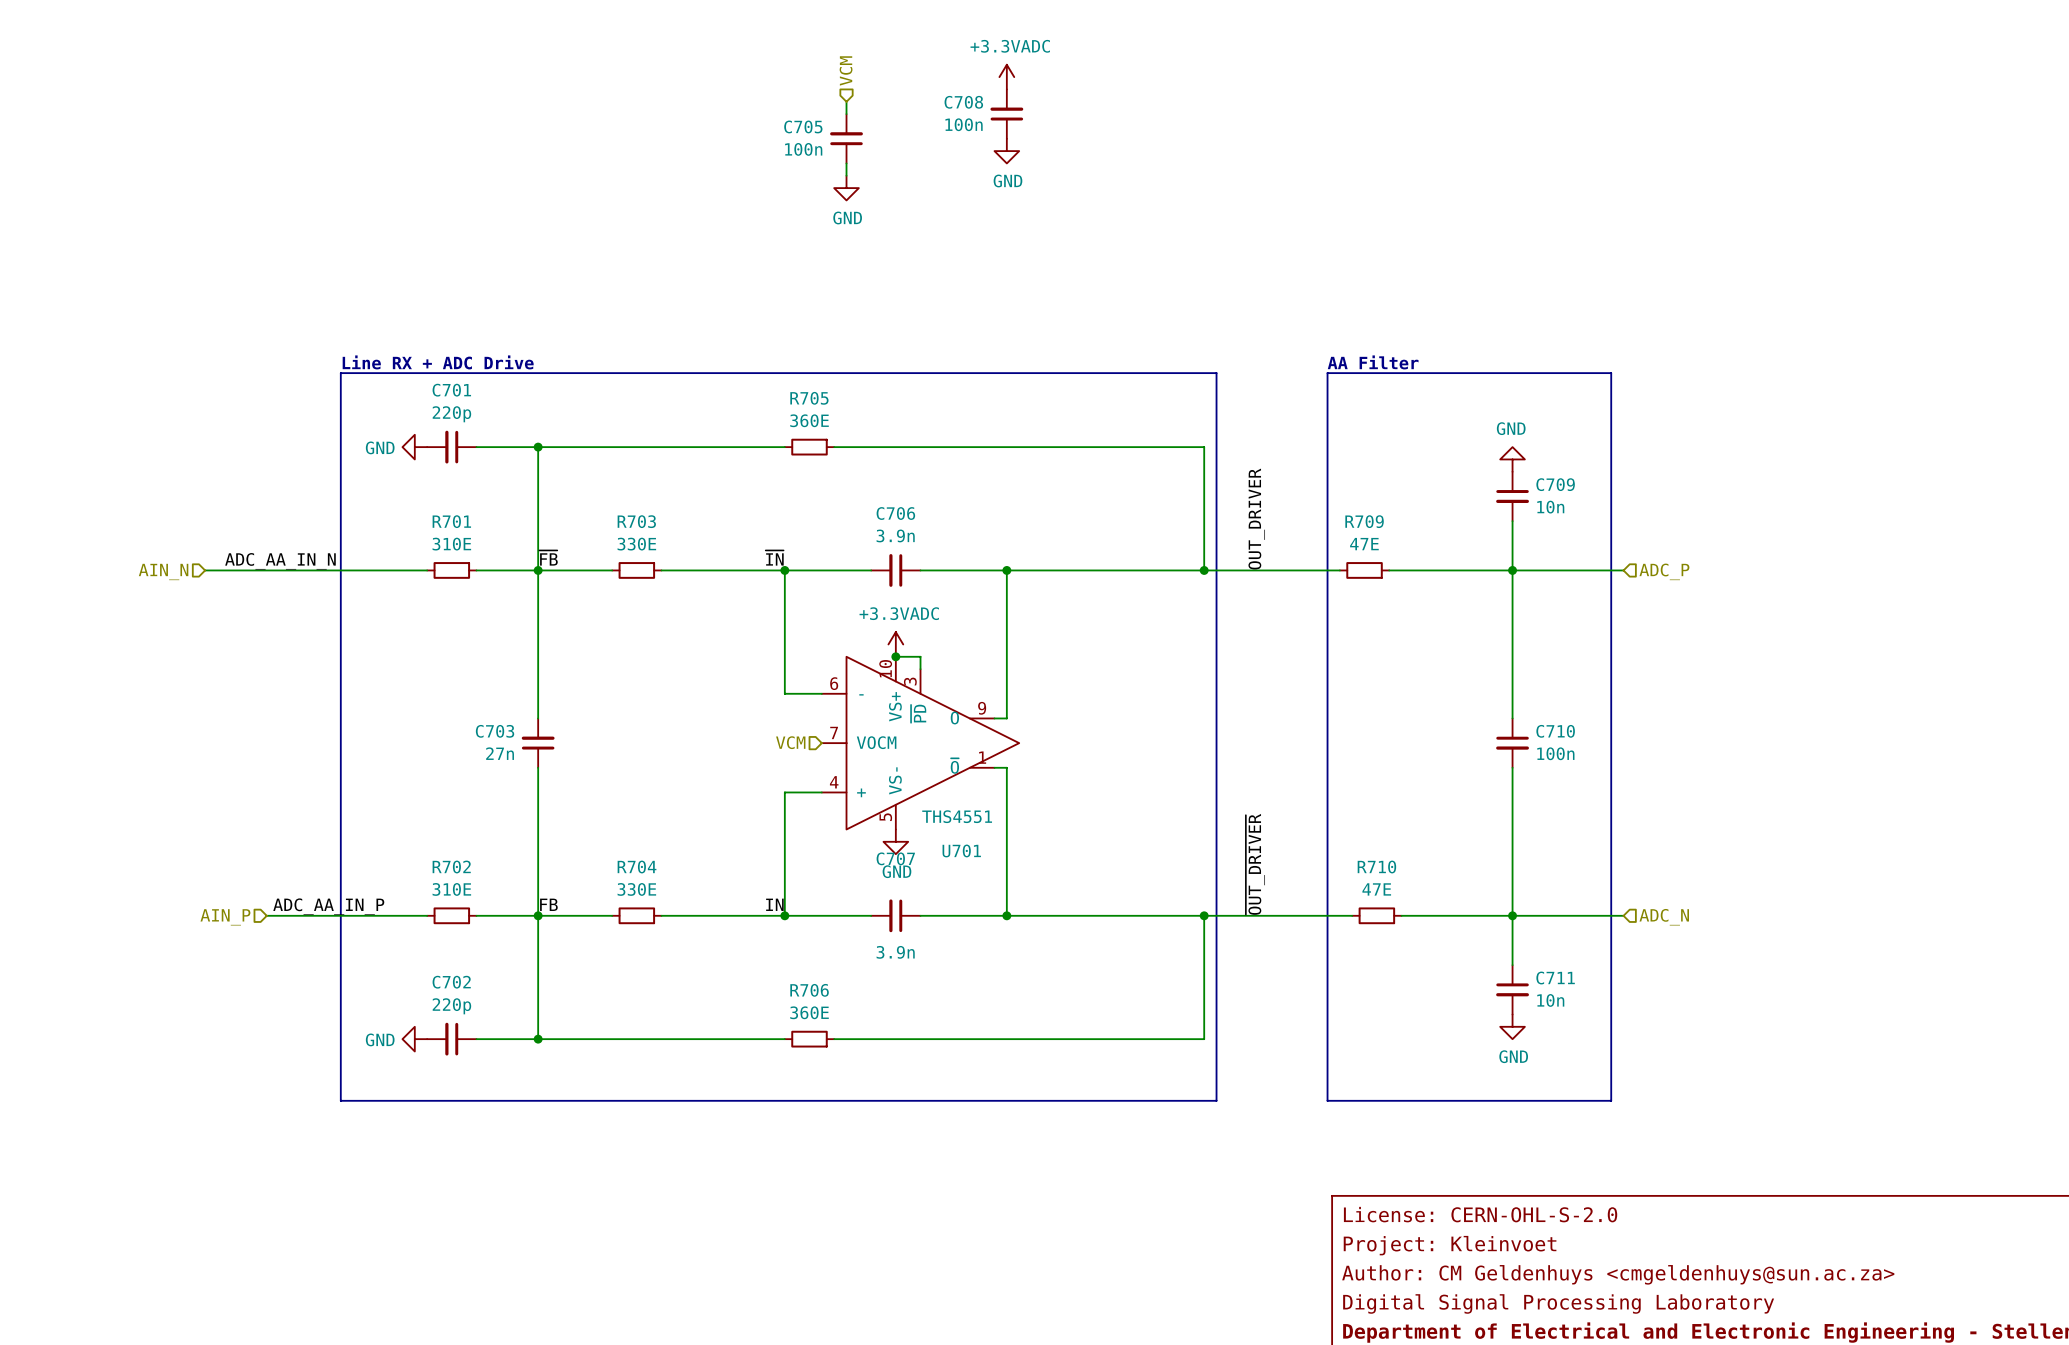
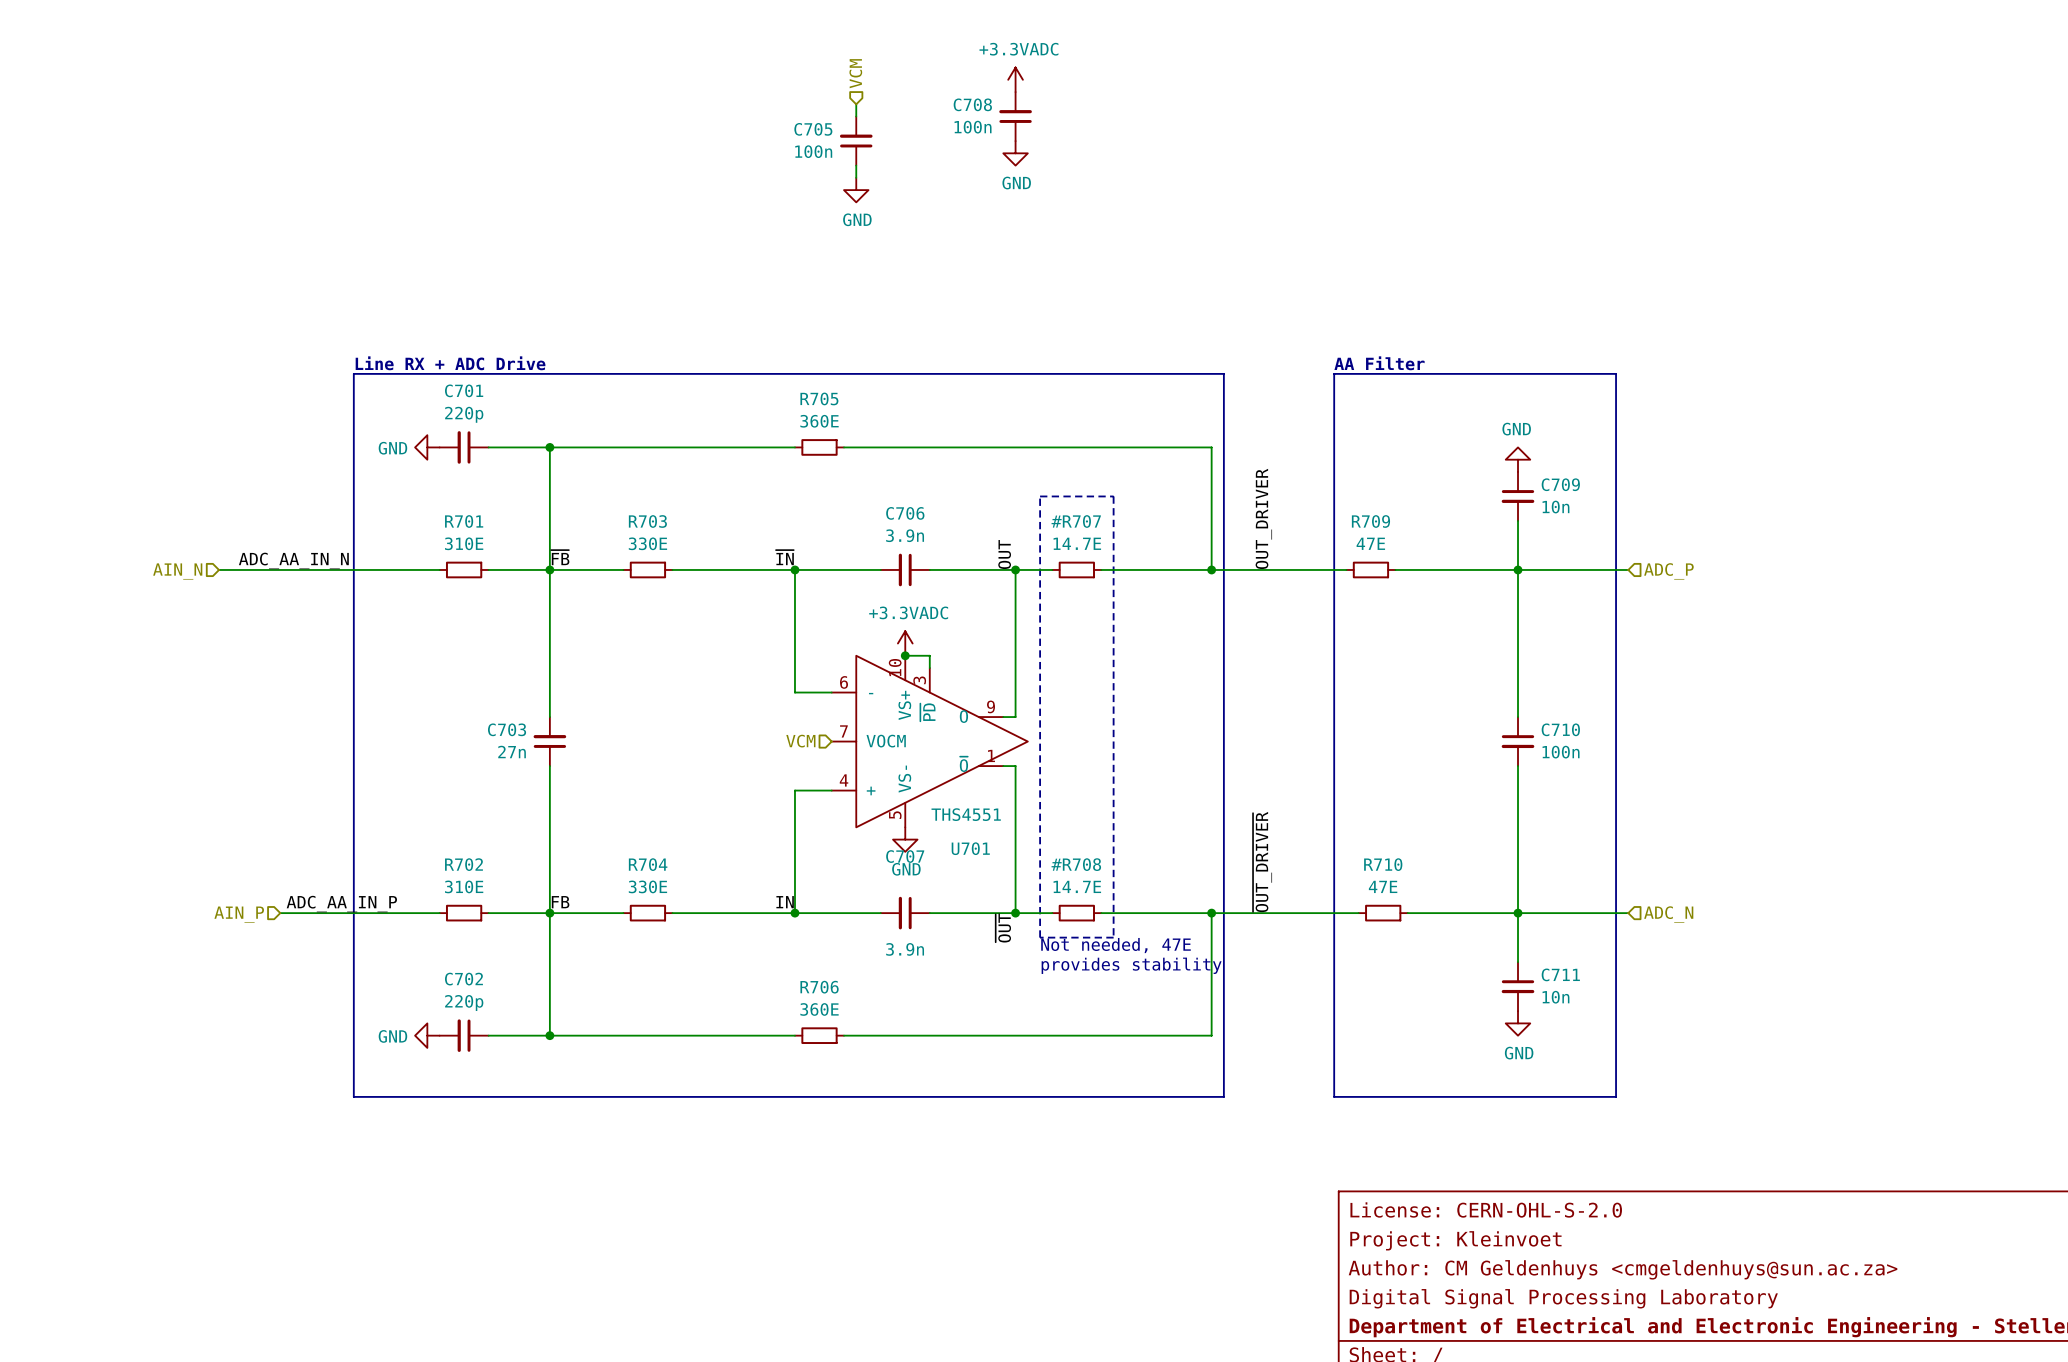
line: none -> (1040, 496) (1113, 496) (1113, 937) (1040, 937) (1040, 496)
label: none -> OUT (1004, 554)
wire: (1043, 570) (1093, 570) -> none
#R707: none -> 14.7E (1076, 569)
wire: (1043, 915) (1093, 915) -> none
#R708: none -> 14.7E (1076, 913)
label: none -> ~{OUT} (1003, 928)
text: none -> Not needed, 47E (1116, 945)
text: none -> provides stability (1131, 965)

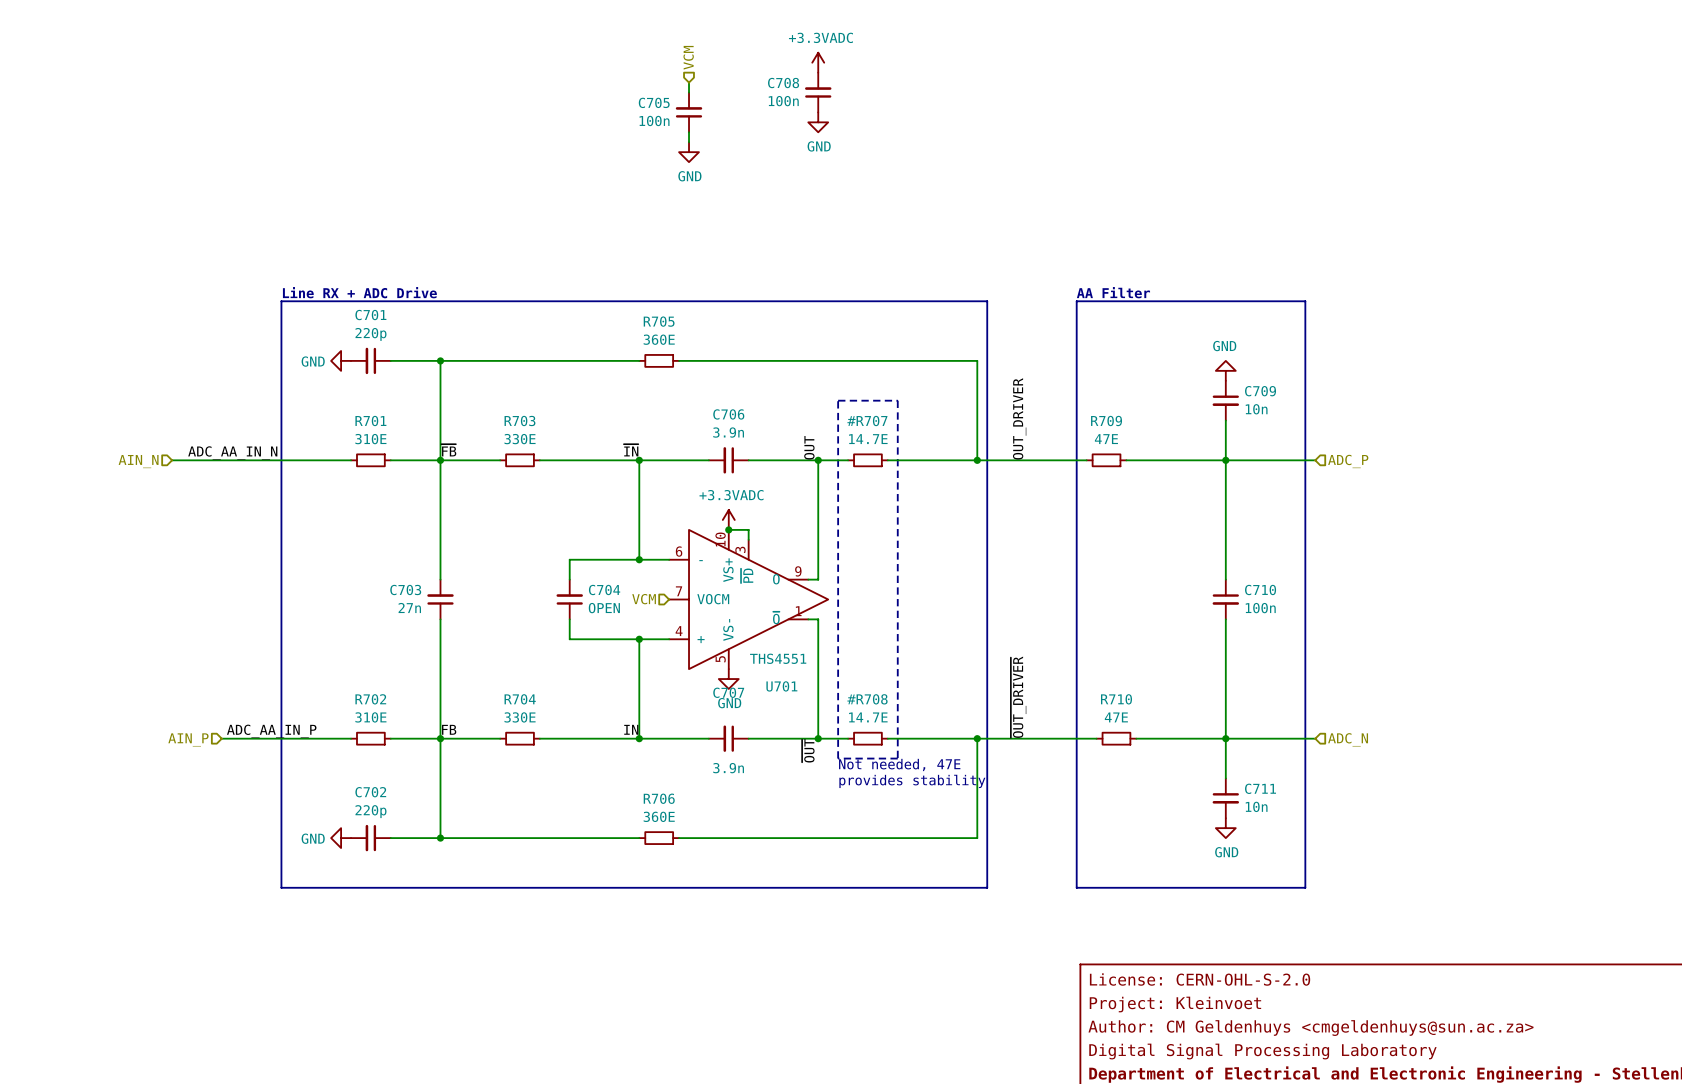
wire: none -> (639, 559) (569, 559) (569, 579)
junction: none -> (639, 559)
C704: none -> OPEN (569, 599)
wire: none -> (569, 619) (569, 639) (639, 639)
junction: none -> (639, 639)

